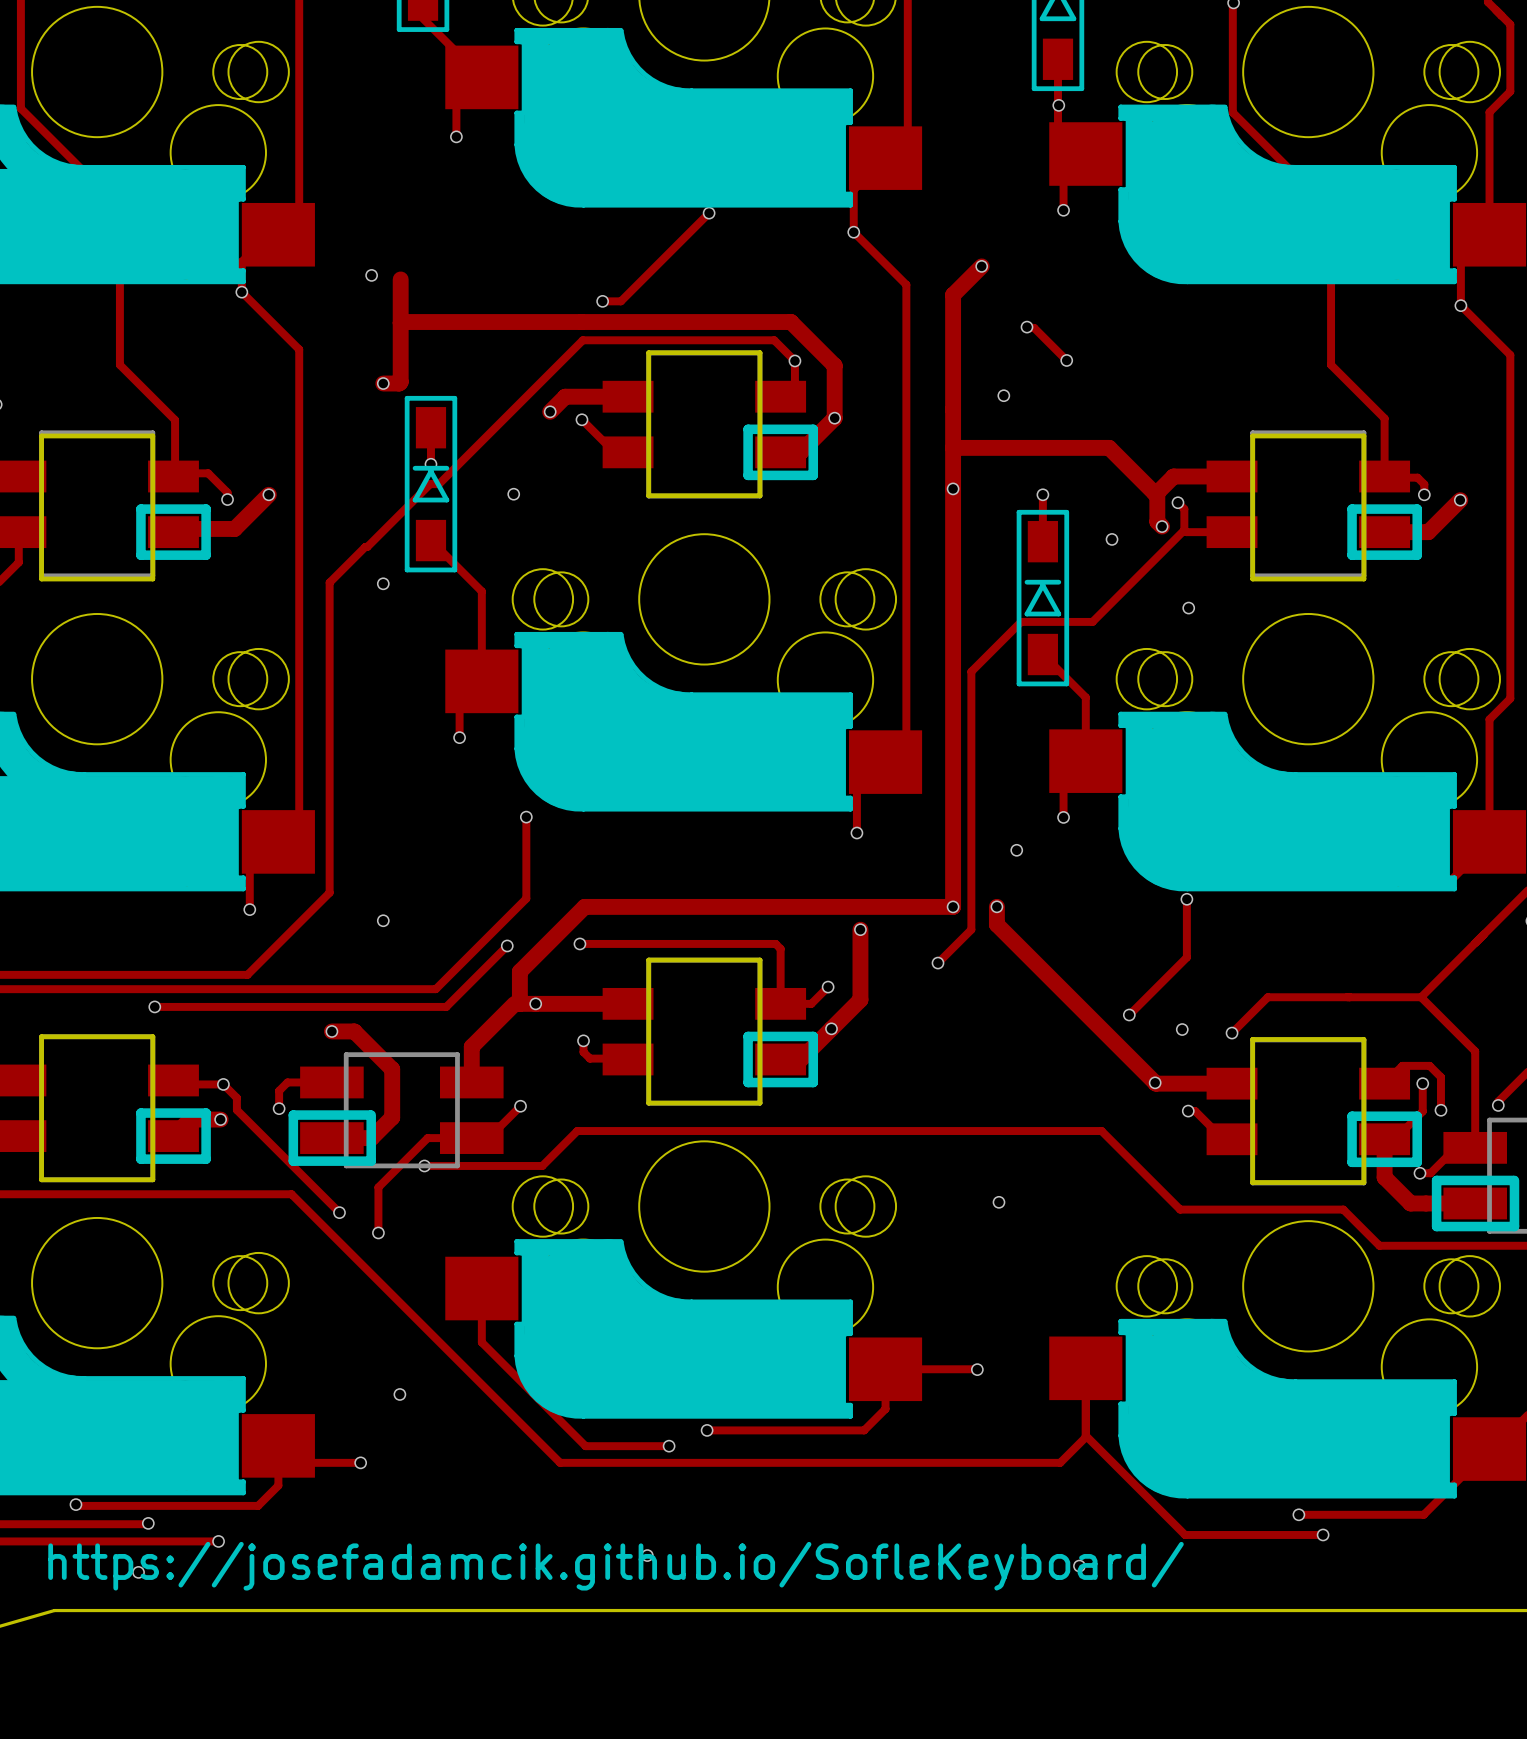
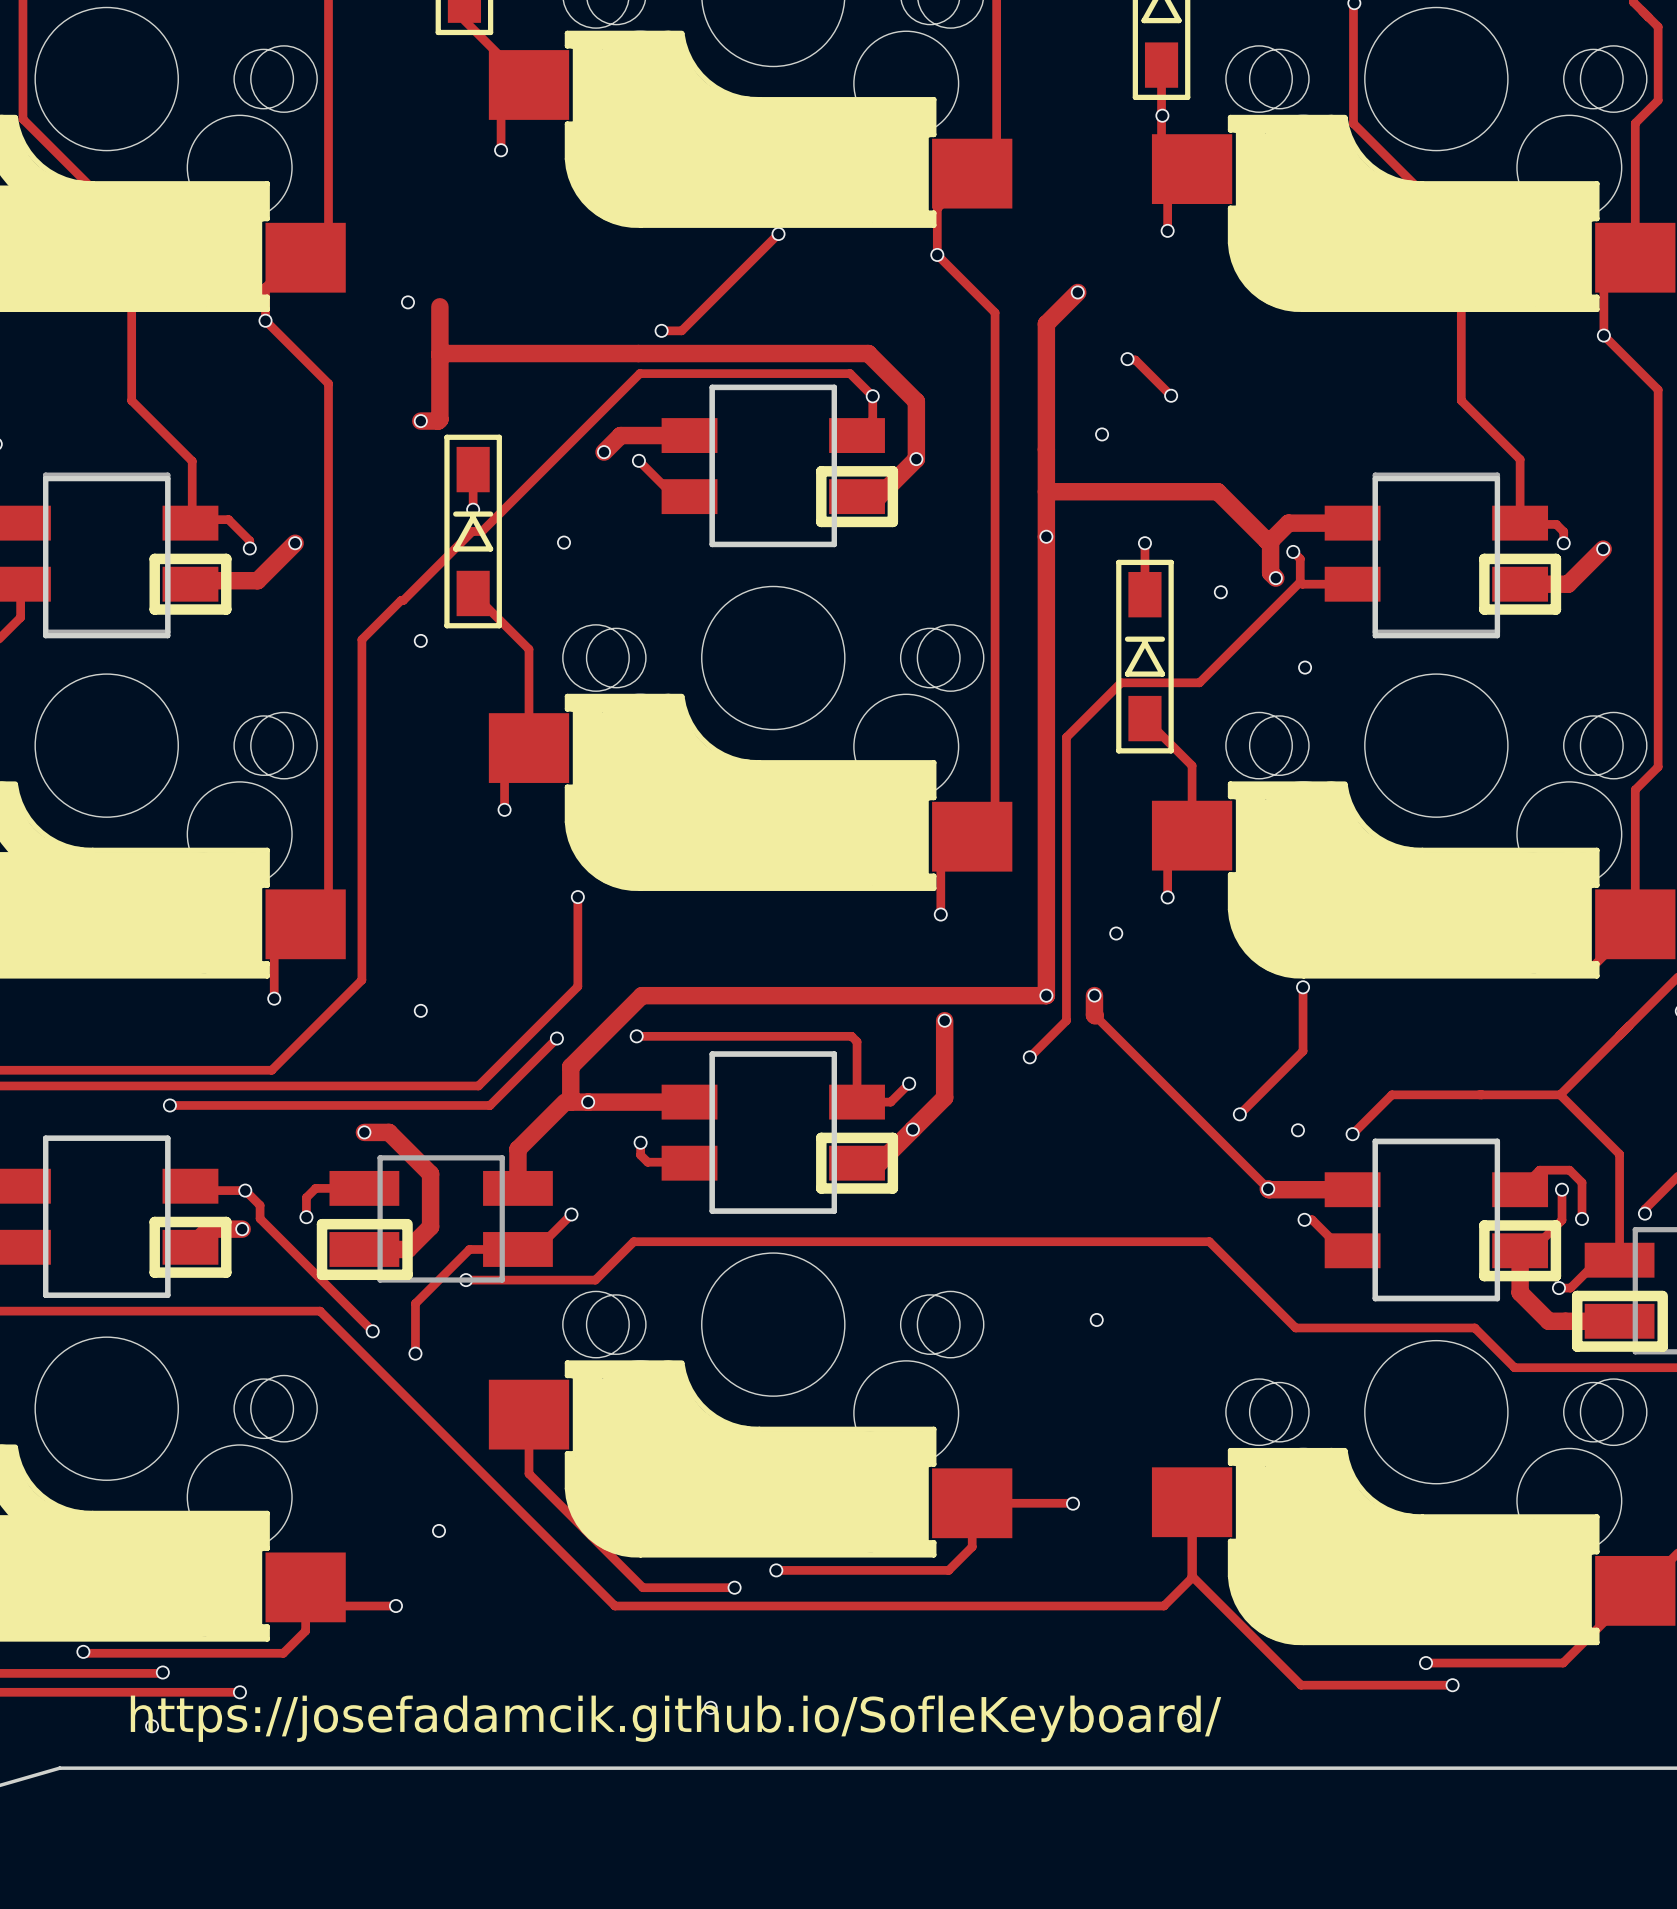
track width: thick (997, 925) (1155, 1082) -> thin (1095, 1015) (1268, 1188)

